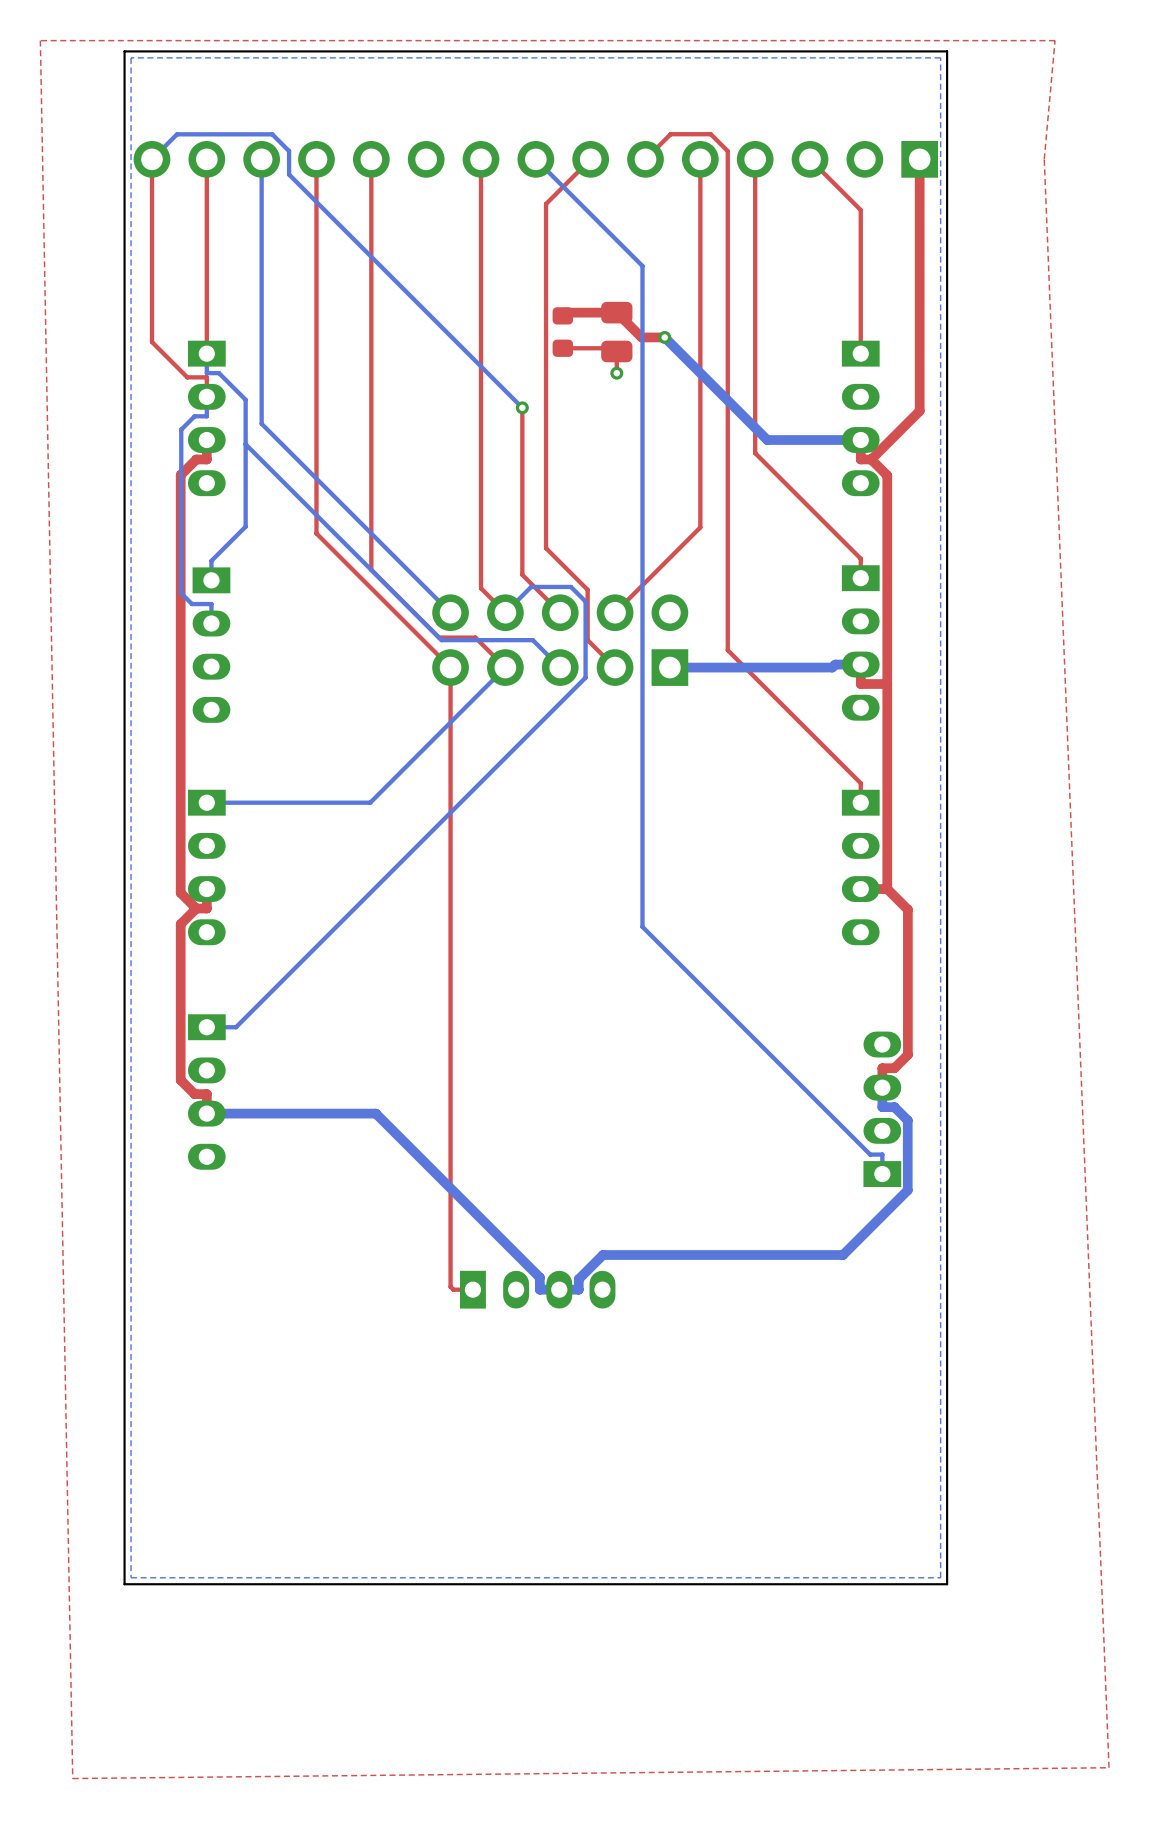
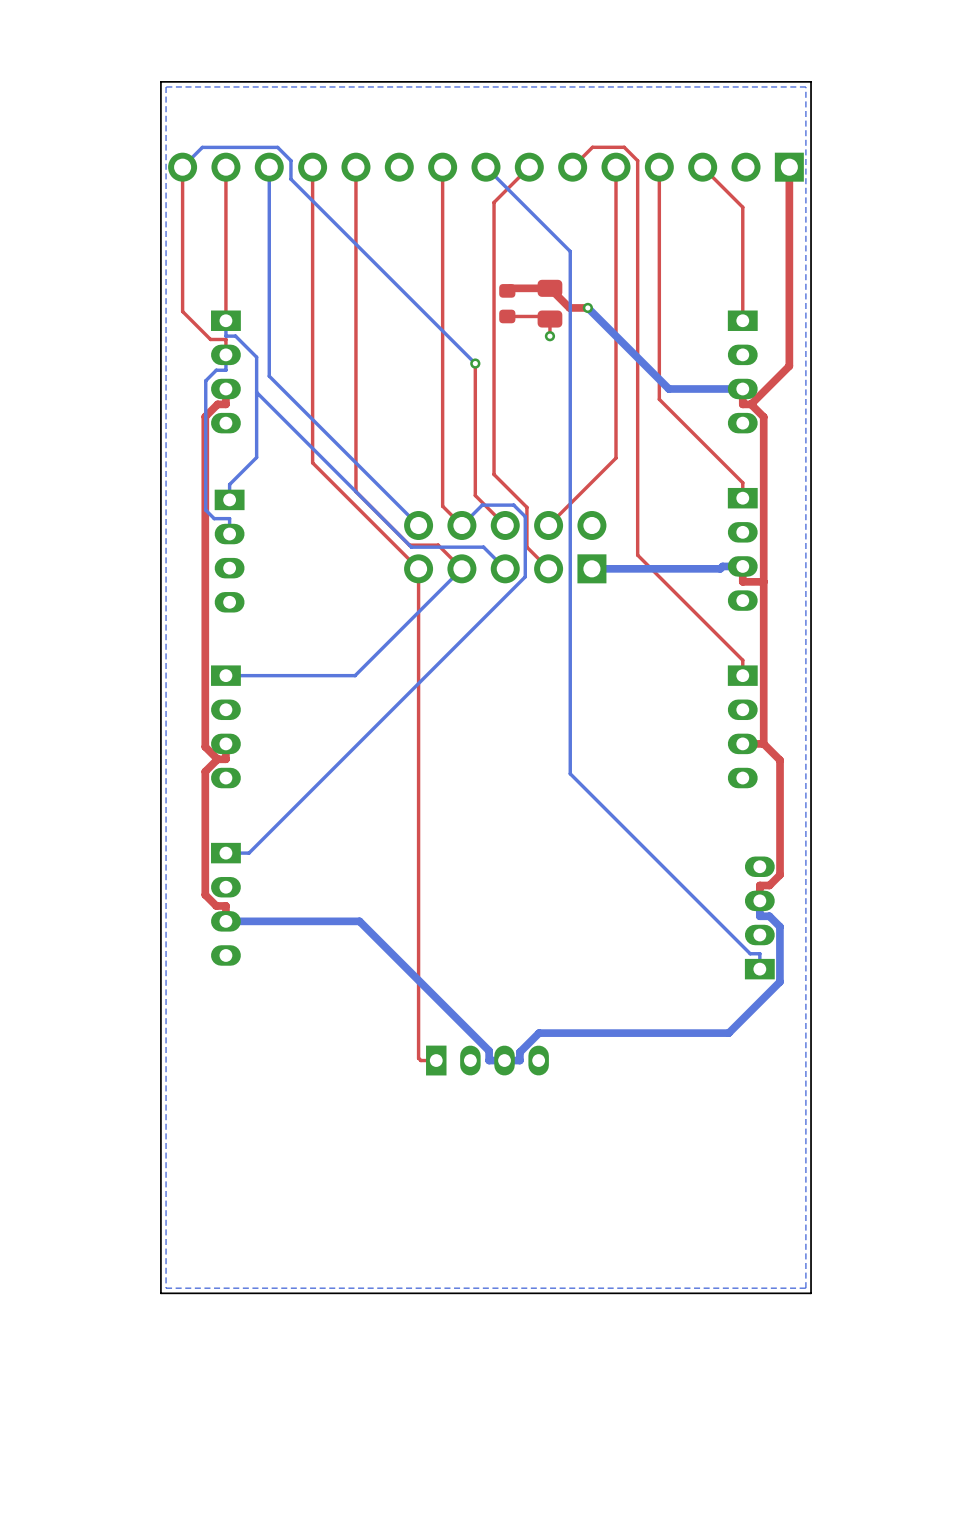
top zone outline: (1055, 40) (40, 40) (72, 1778) (1109, 1767) (1044, 159) (1055, 40) -> none

